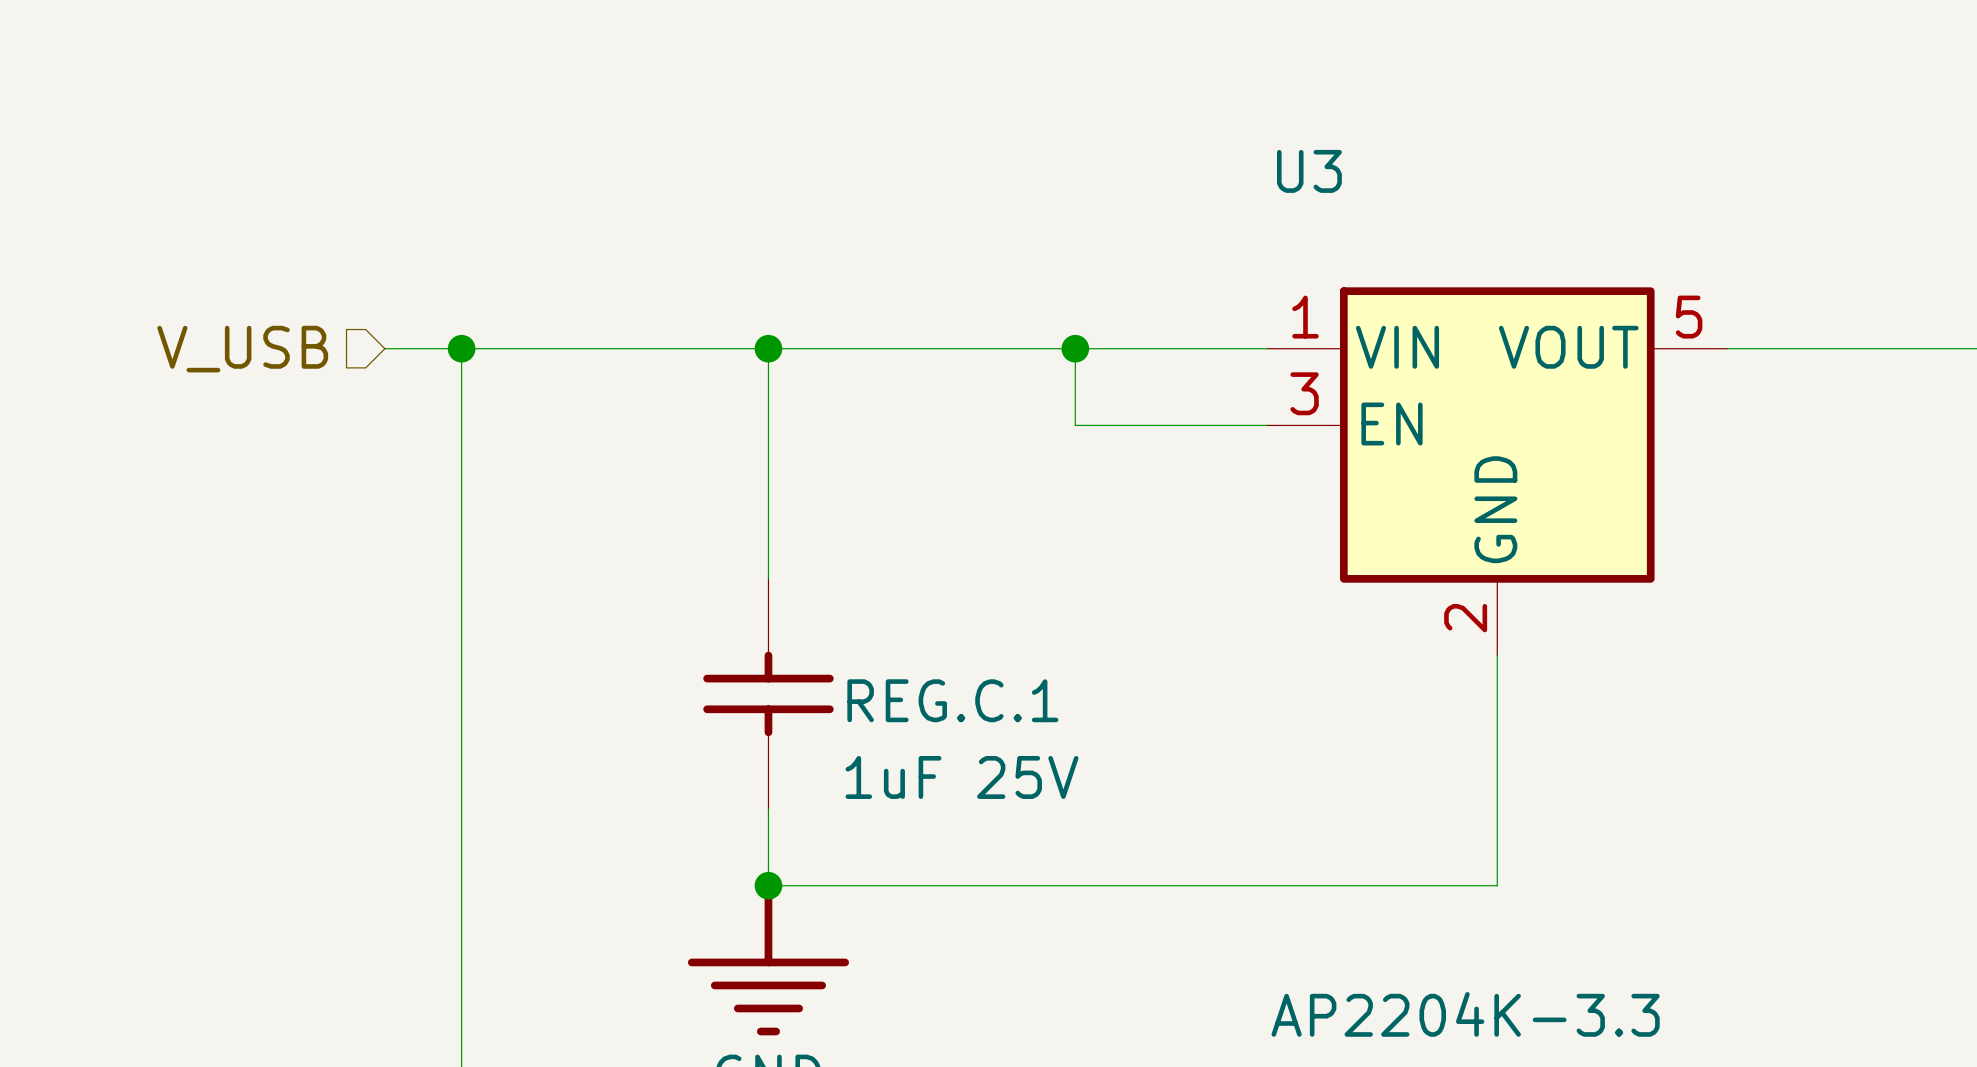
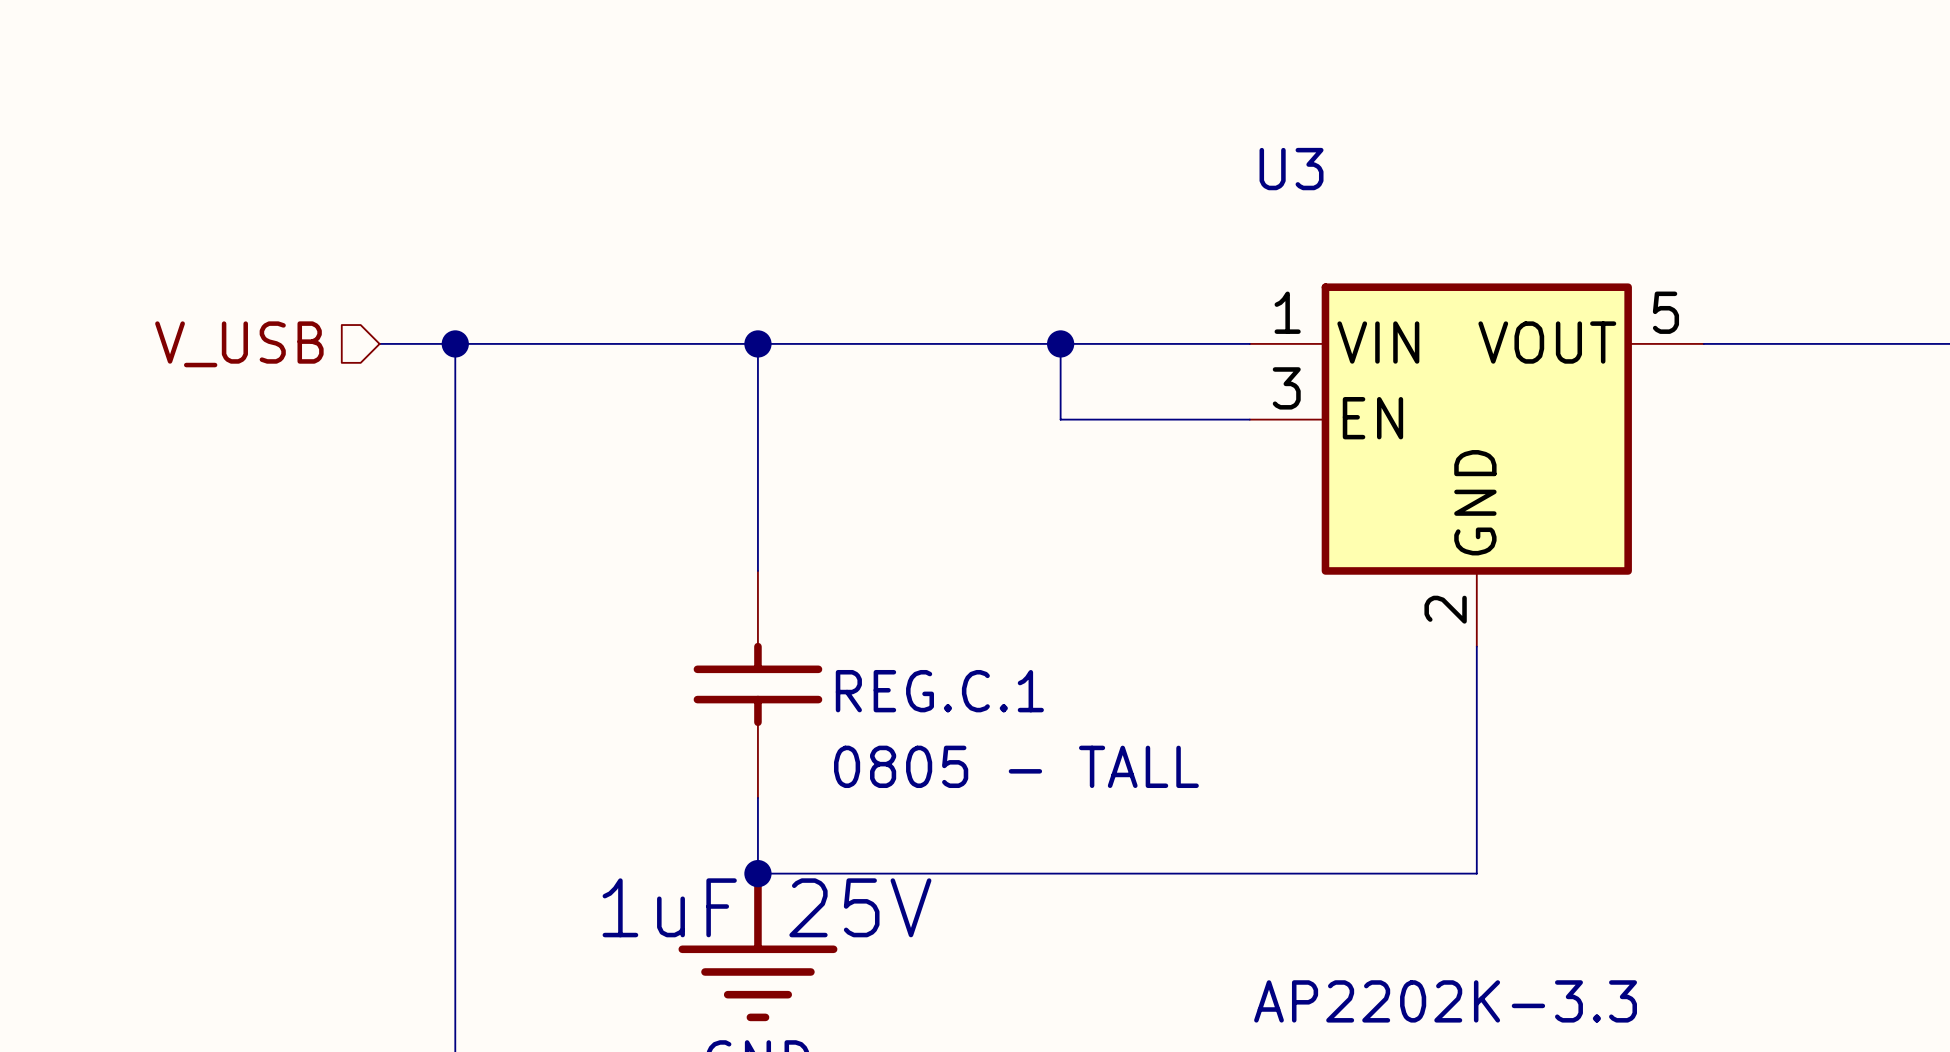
REG.C.1 value: 1uF 25V (962, 777) -> 0805 - TALL (1016, 766)
REG.C.1 text: none -> 1uF 25V (766, 907)
U3 value: AP2204K-3.3 (1465, 1014) -> AP2202K-3.3 (1445, 1001)

